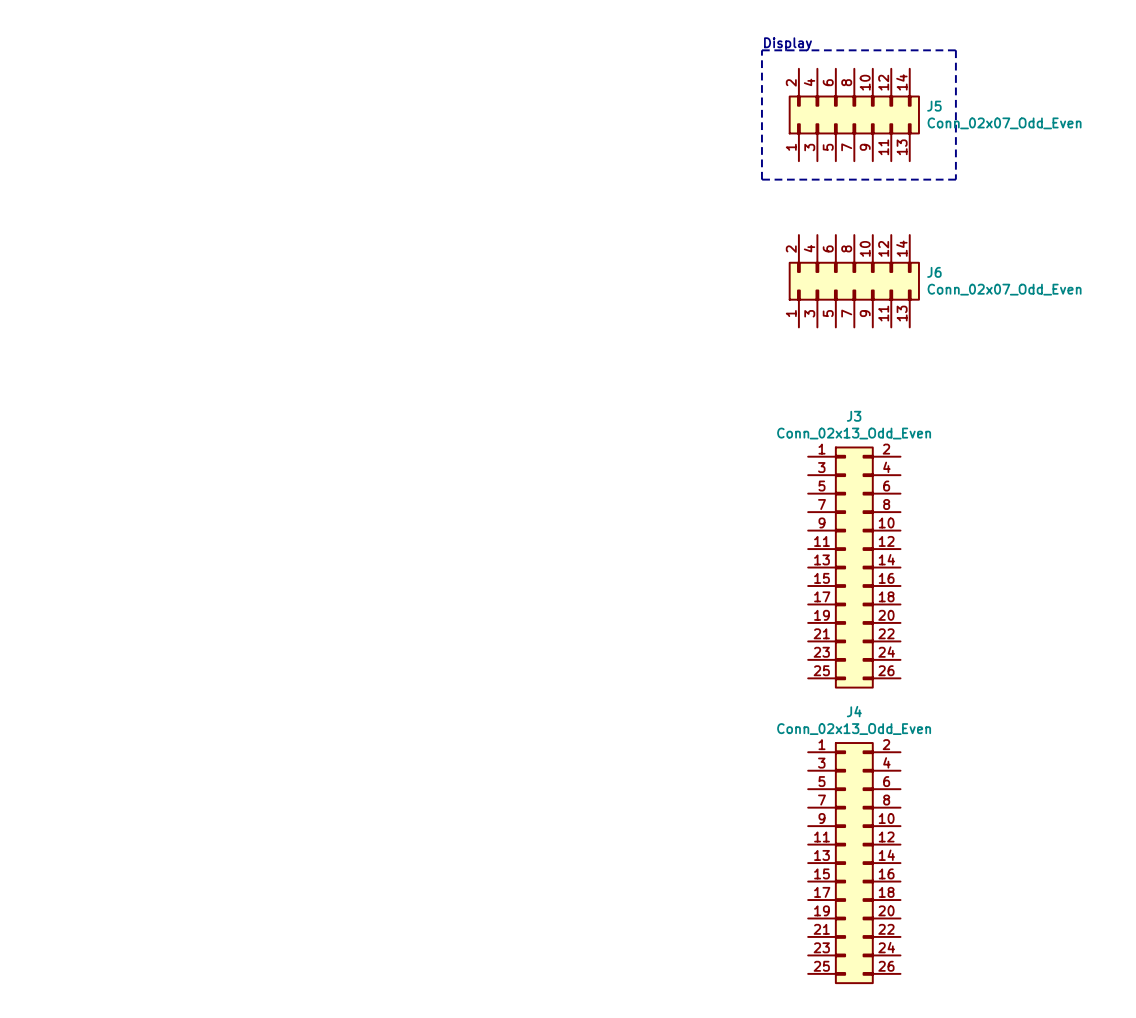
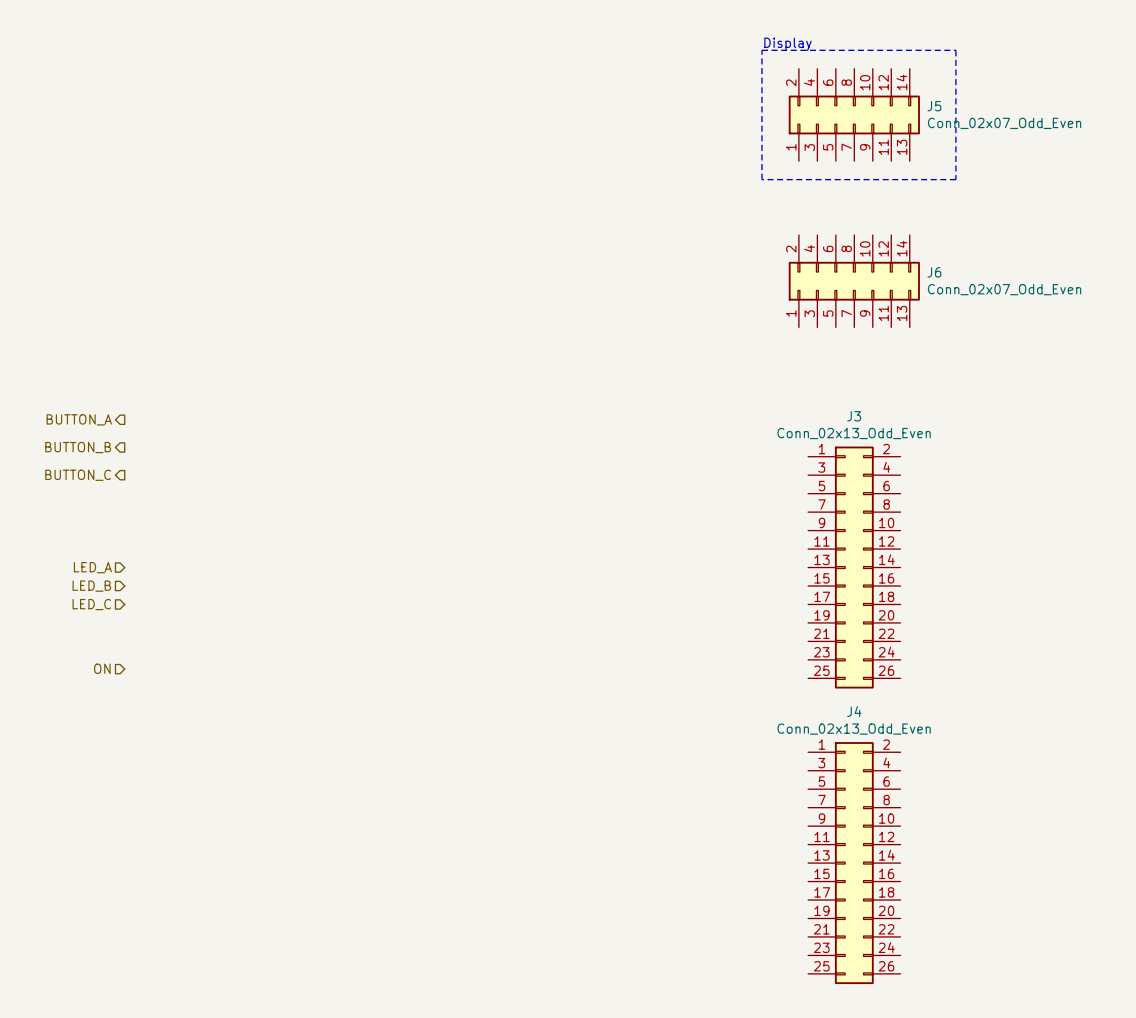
hierarchical label: none -> BUTTON_A (79, 419)
hierarchical label: none -> BUTTON_B (78, 447)
hierarchical label: none -> BUTTON_C (78, 475)
hierarchical label: none -> LED_A (92, 567)
hierarchical label: none -> LED_B (91, 586)
hierarchical label: none -> LED_C (91, 604)
hierarchical label: none -> ON (102, 668)

